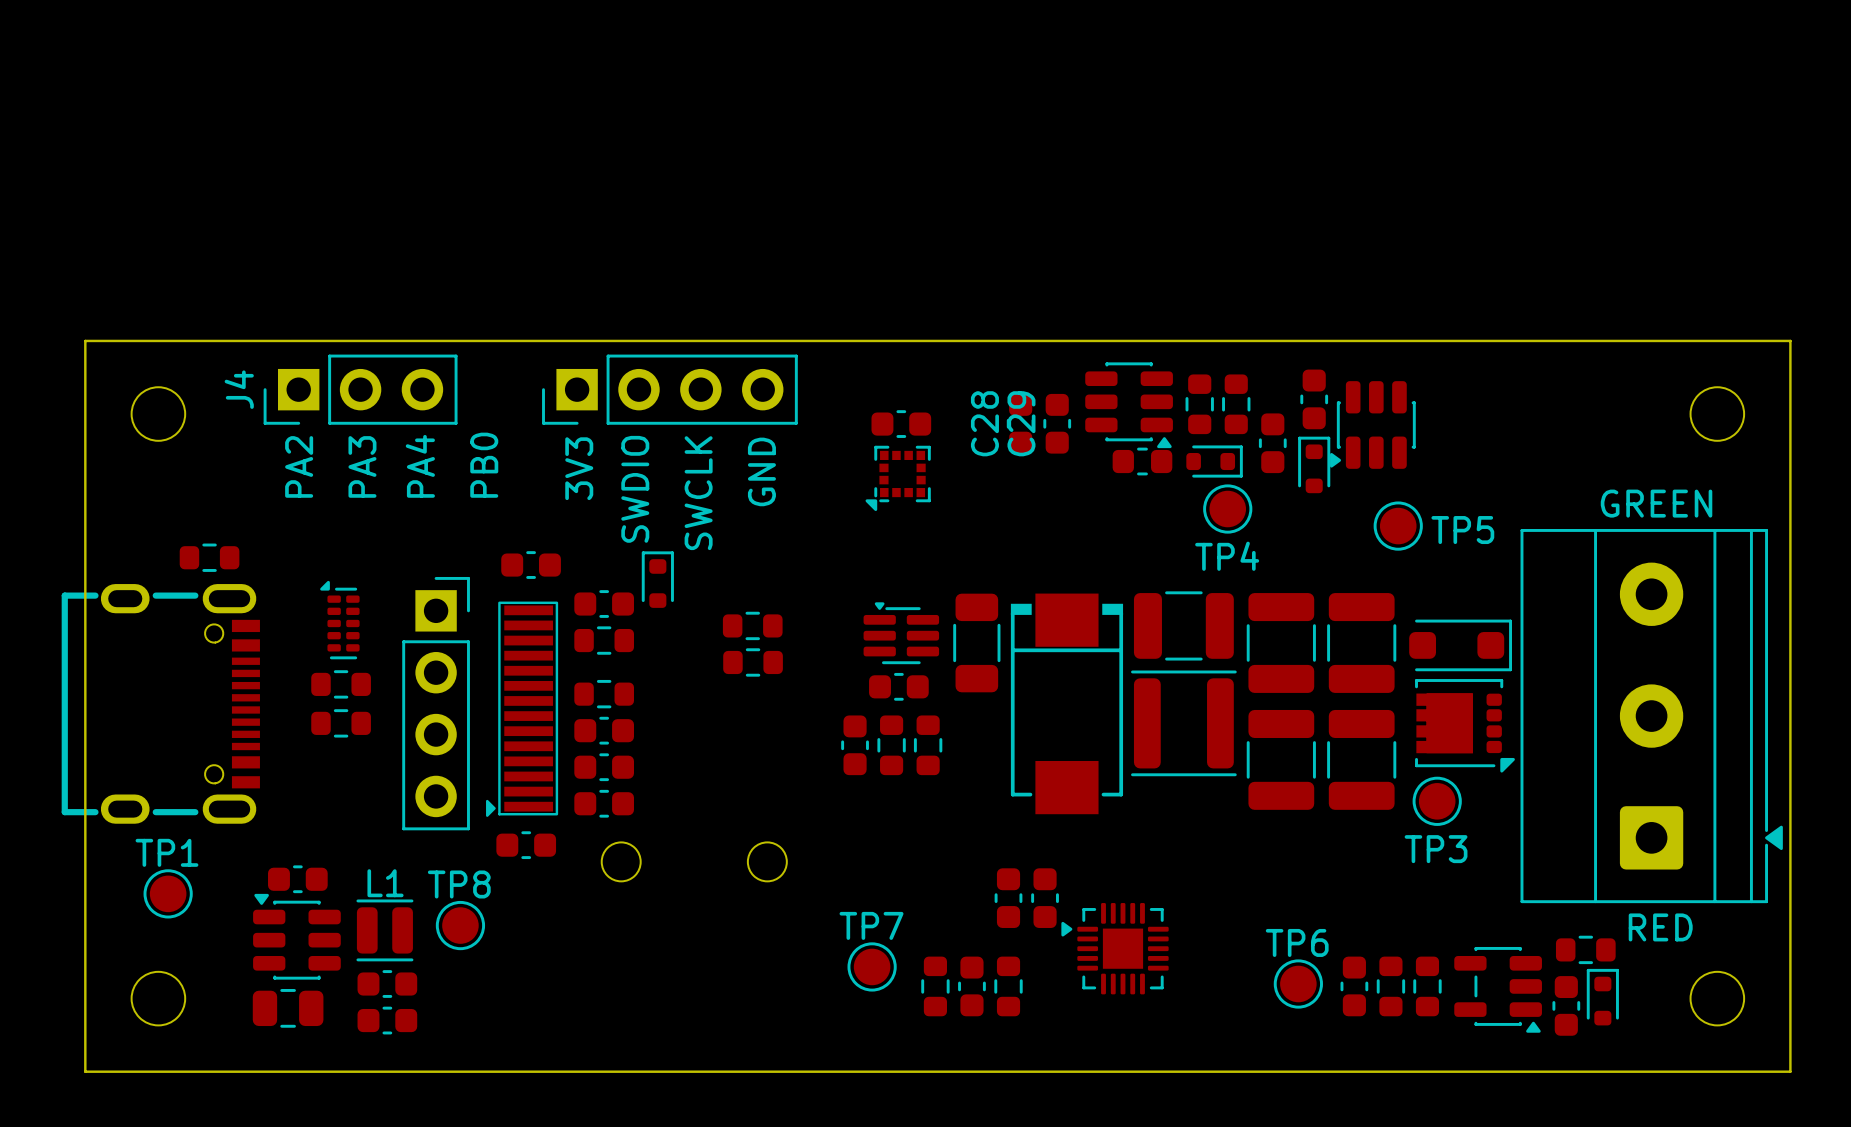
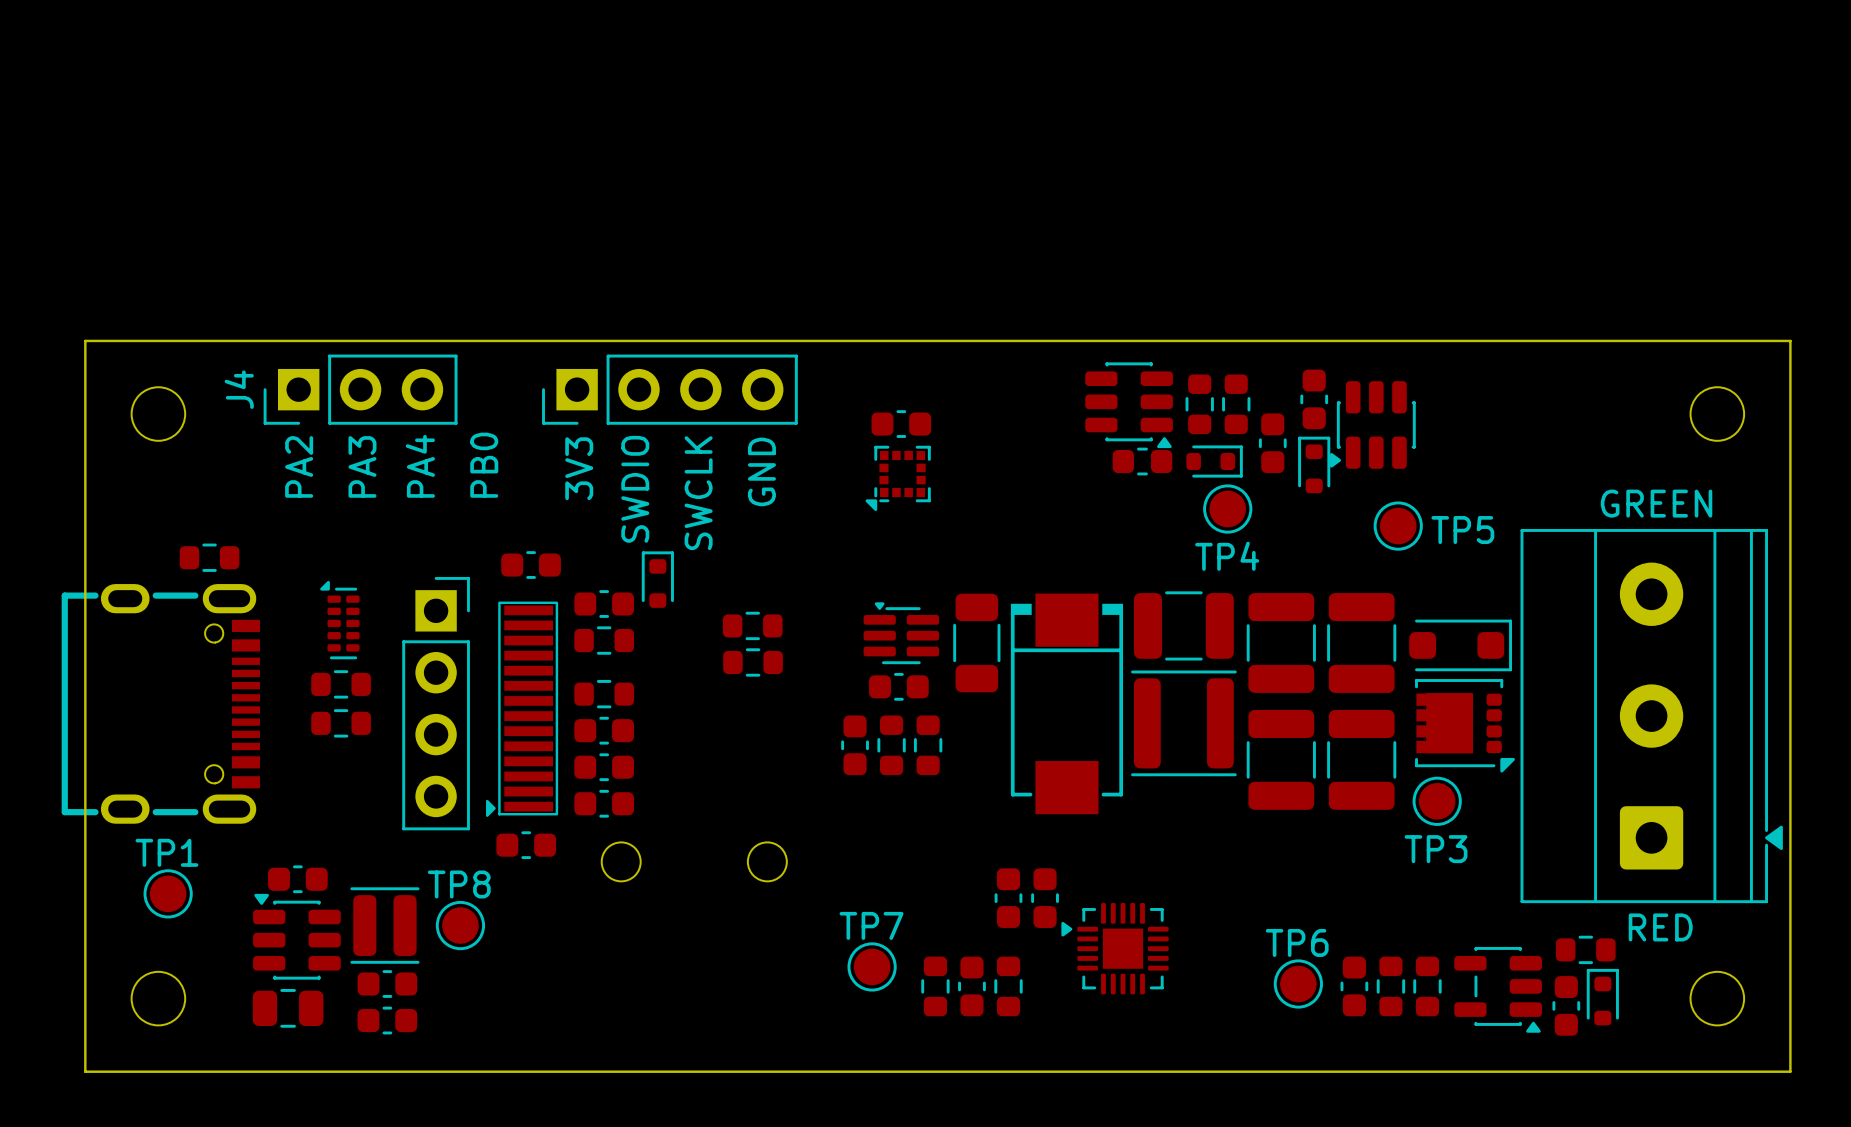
C28: (1020, 423) -> none
C29: (1057, 423) -> none
part: none -> (384, 925)
L1: (384, 930) -> none

